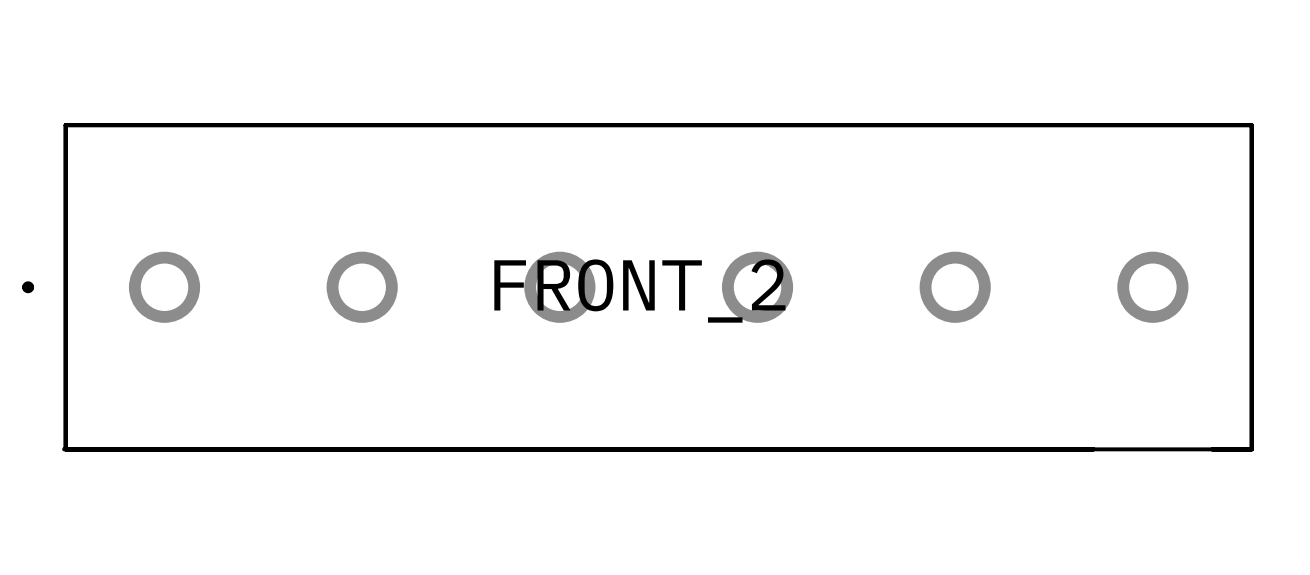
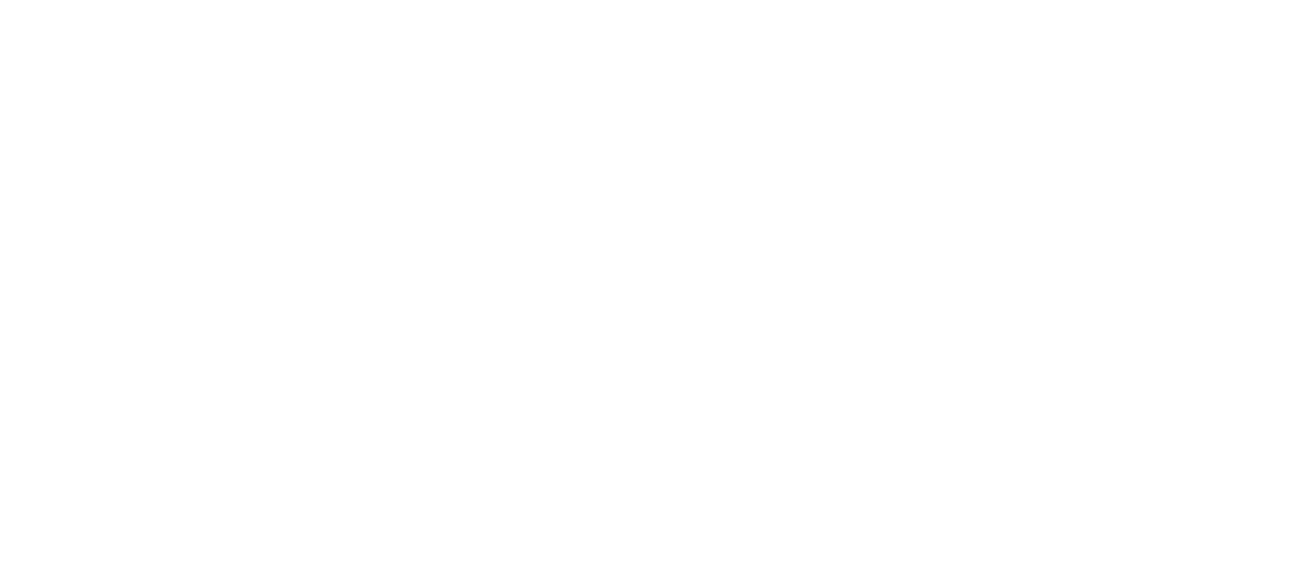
FRONT_2: (637, 287) -> none

